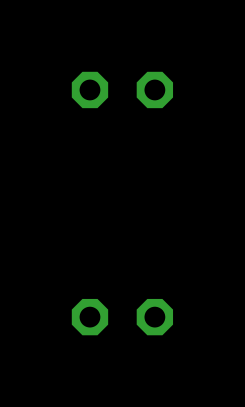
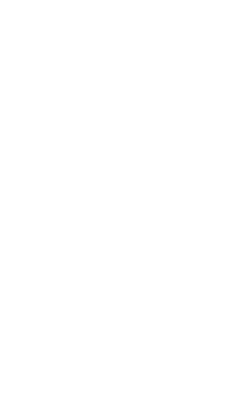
part: (122, 89) -> none
part: (122, 317) -> none

